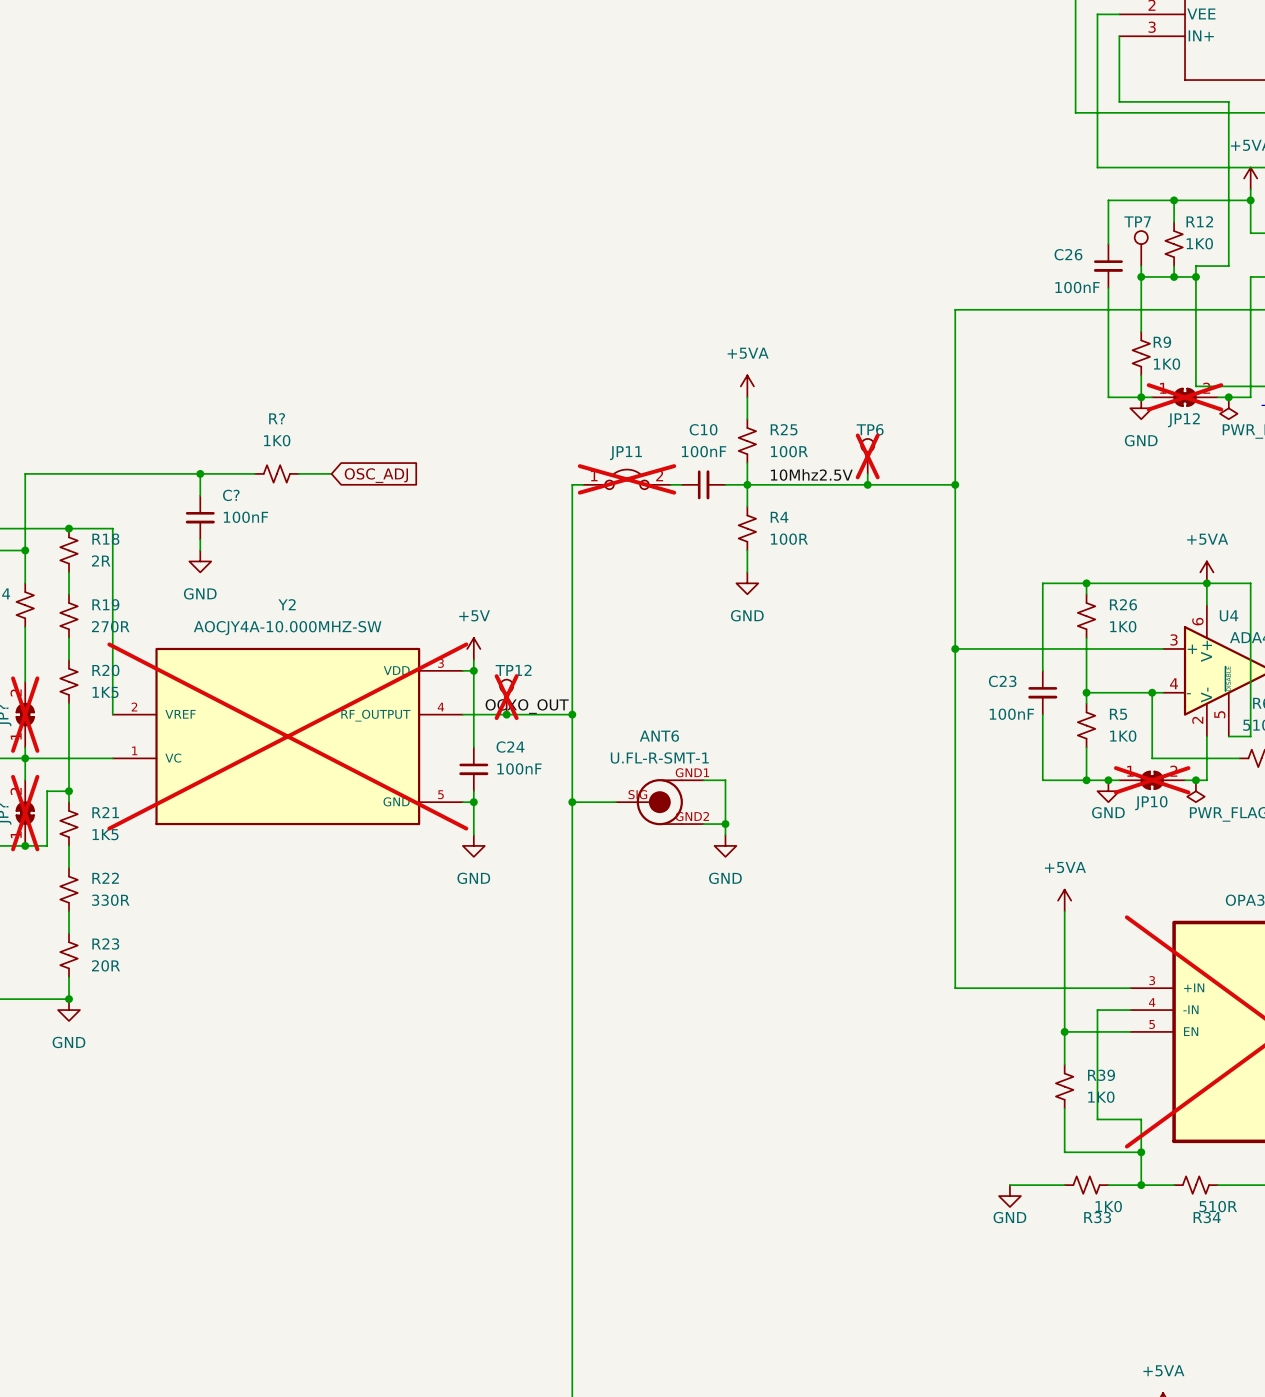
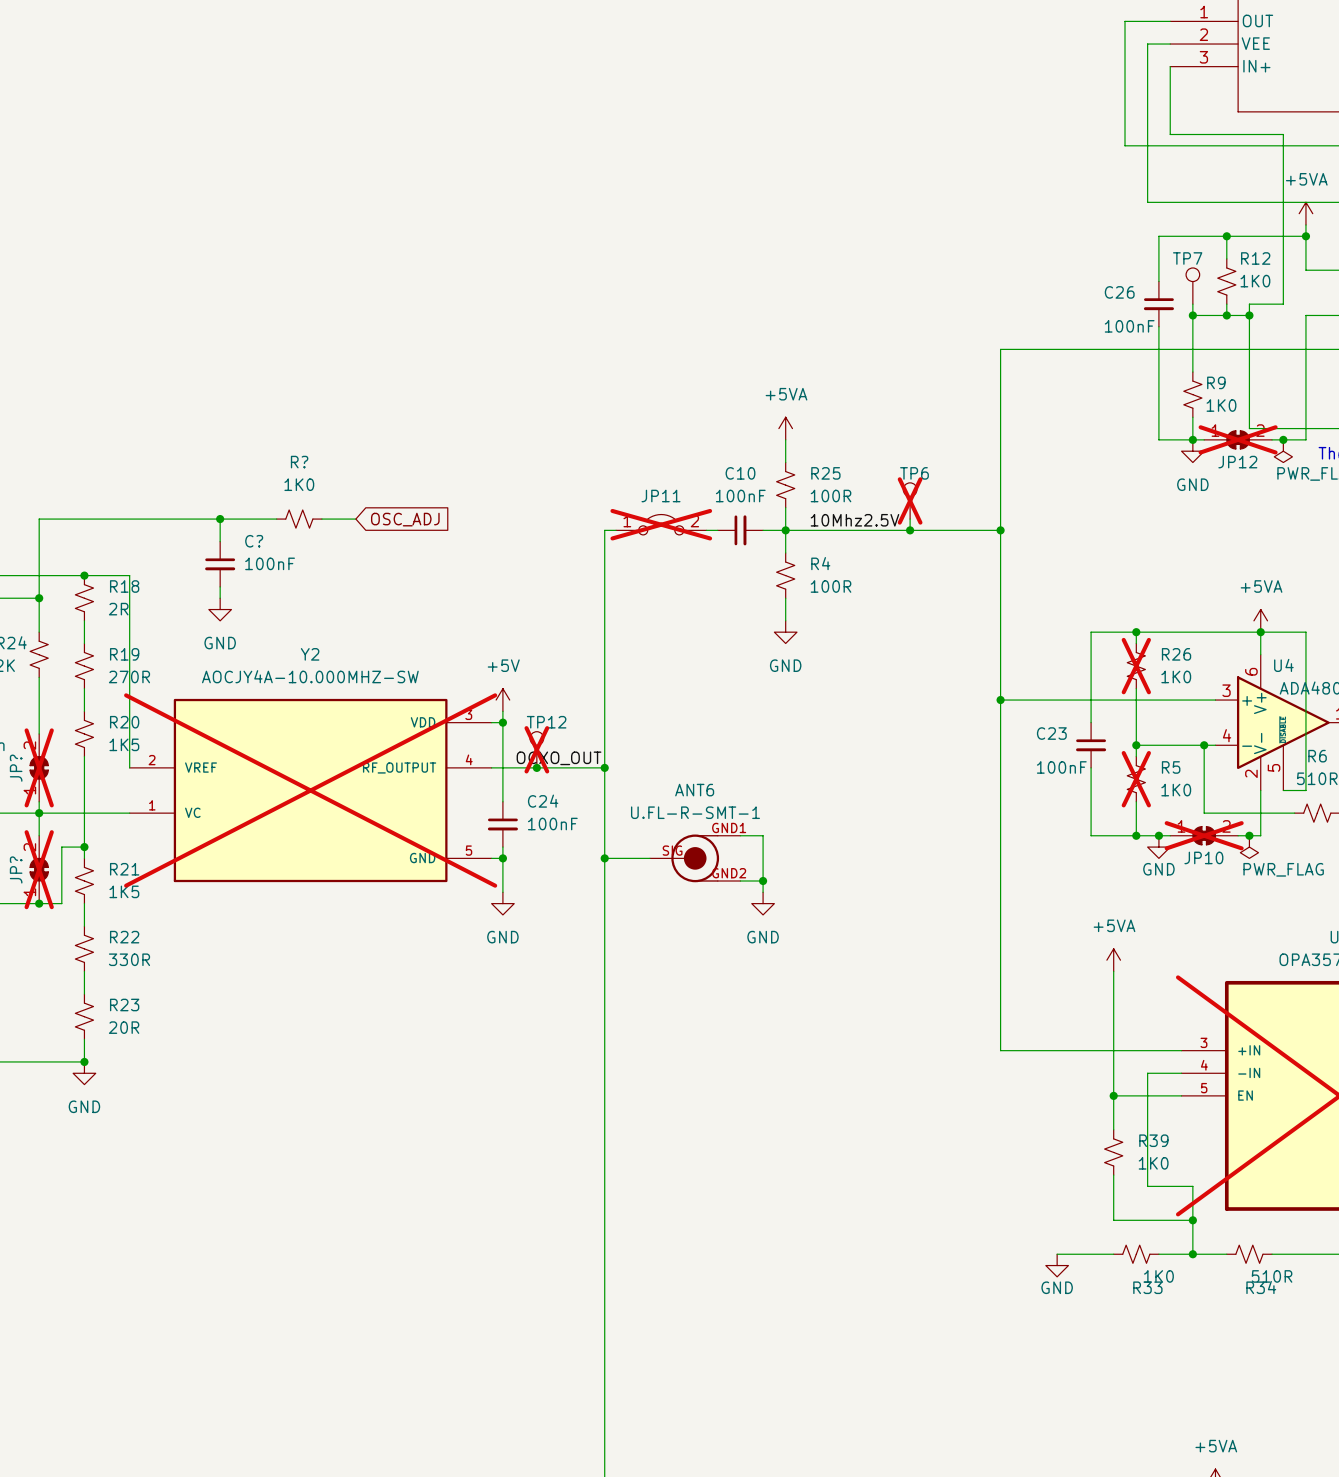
R26 do-not-place cross: none -> (1136, 666)
R5 do-not-place cross: none -> (1136, 779)

